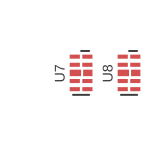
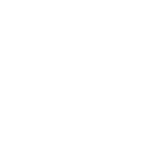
U7: (81, 72) -> none
U8: (129, 72) -> none

